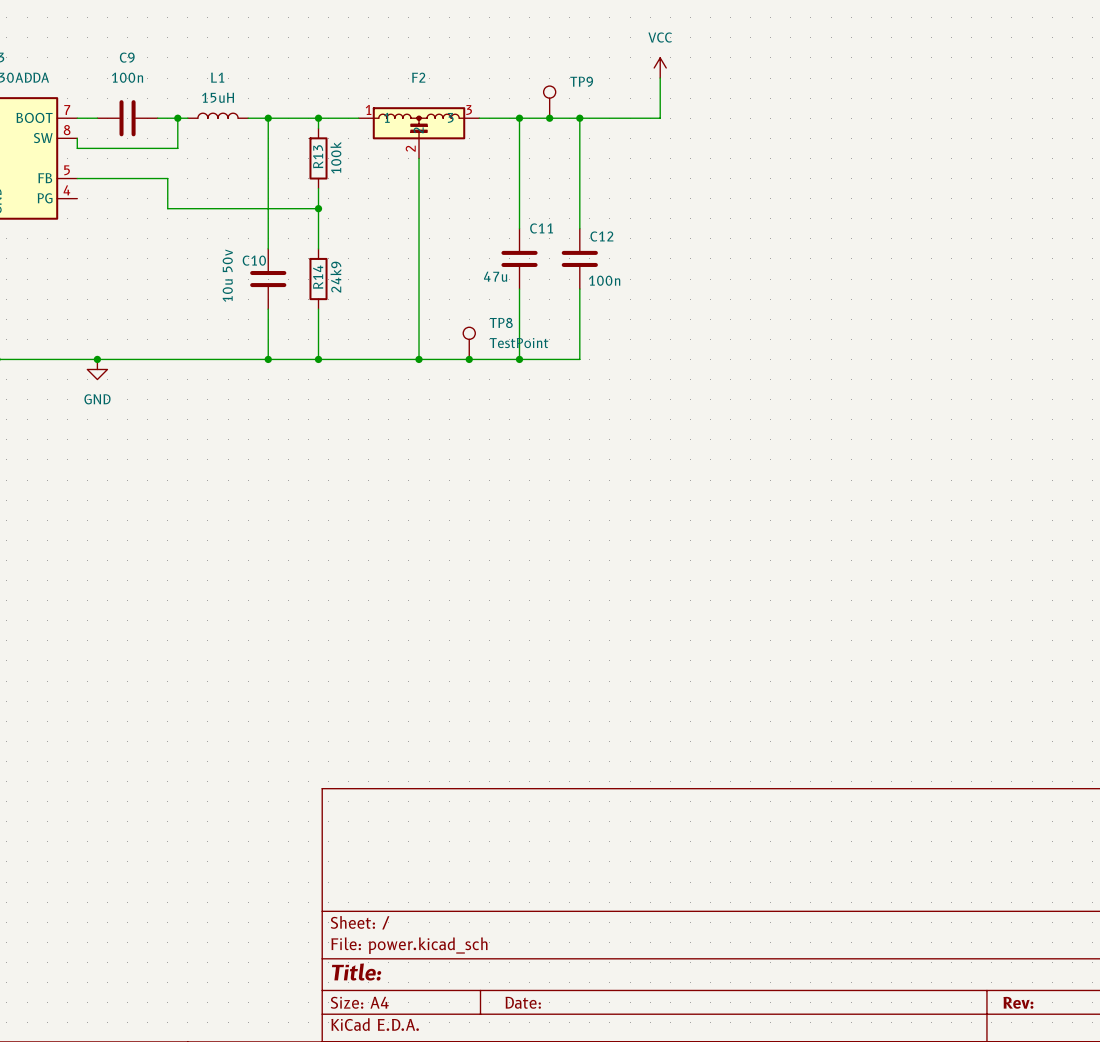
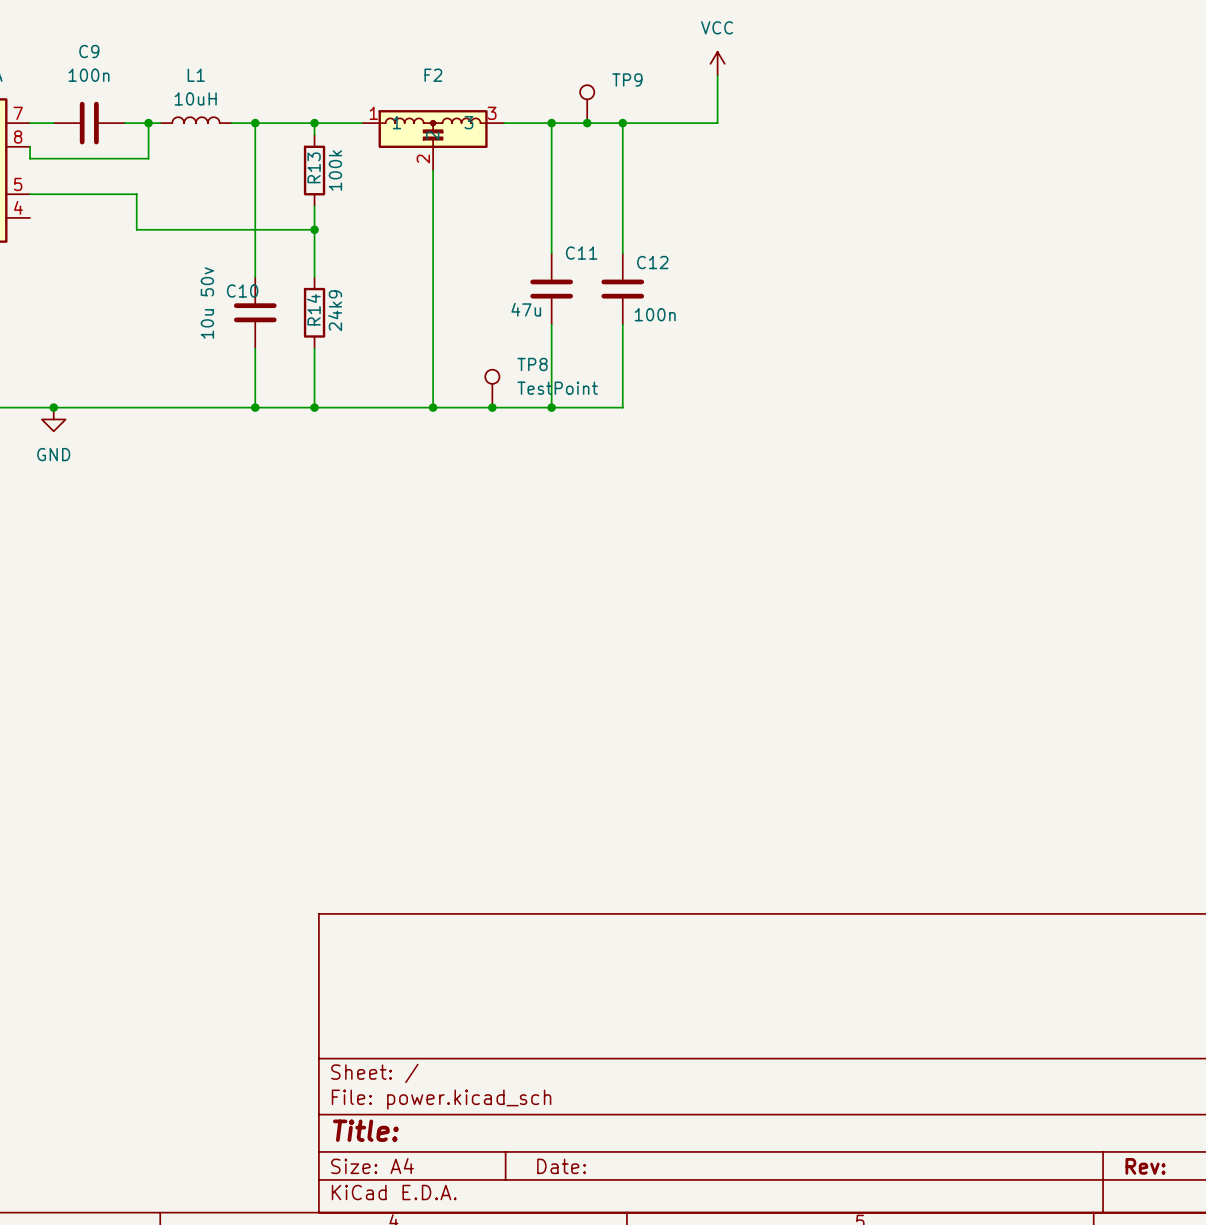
L1 value: 15uH (218, 97) -> 10uH (195, 98)

